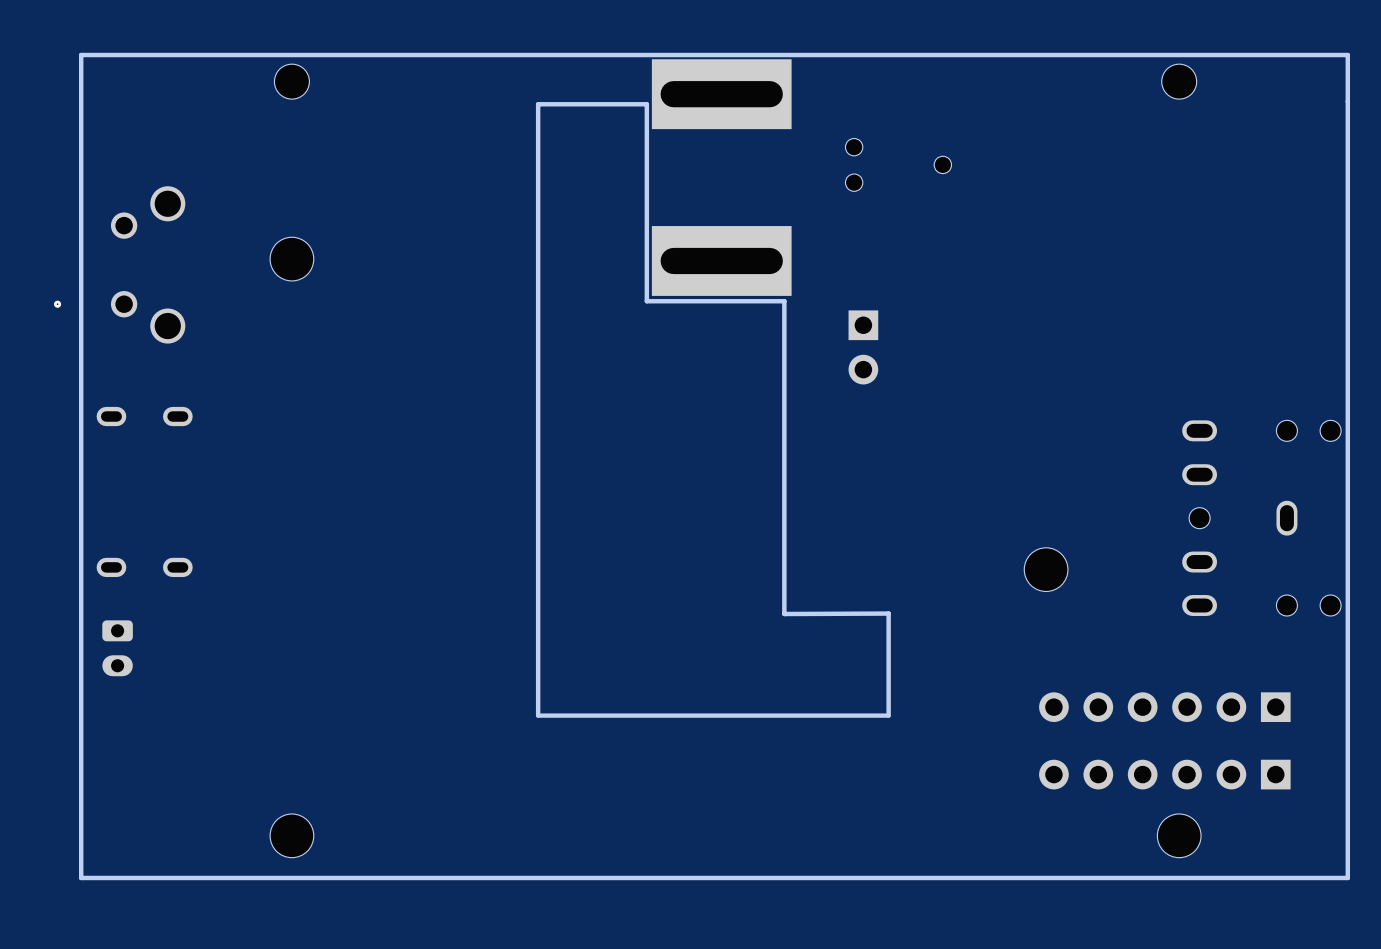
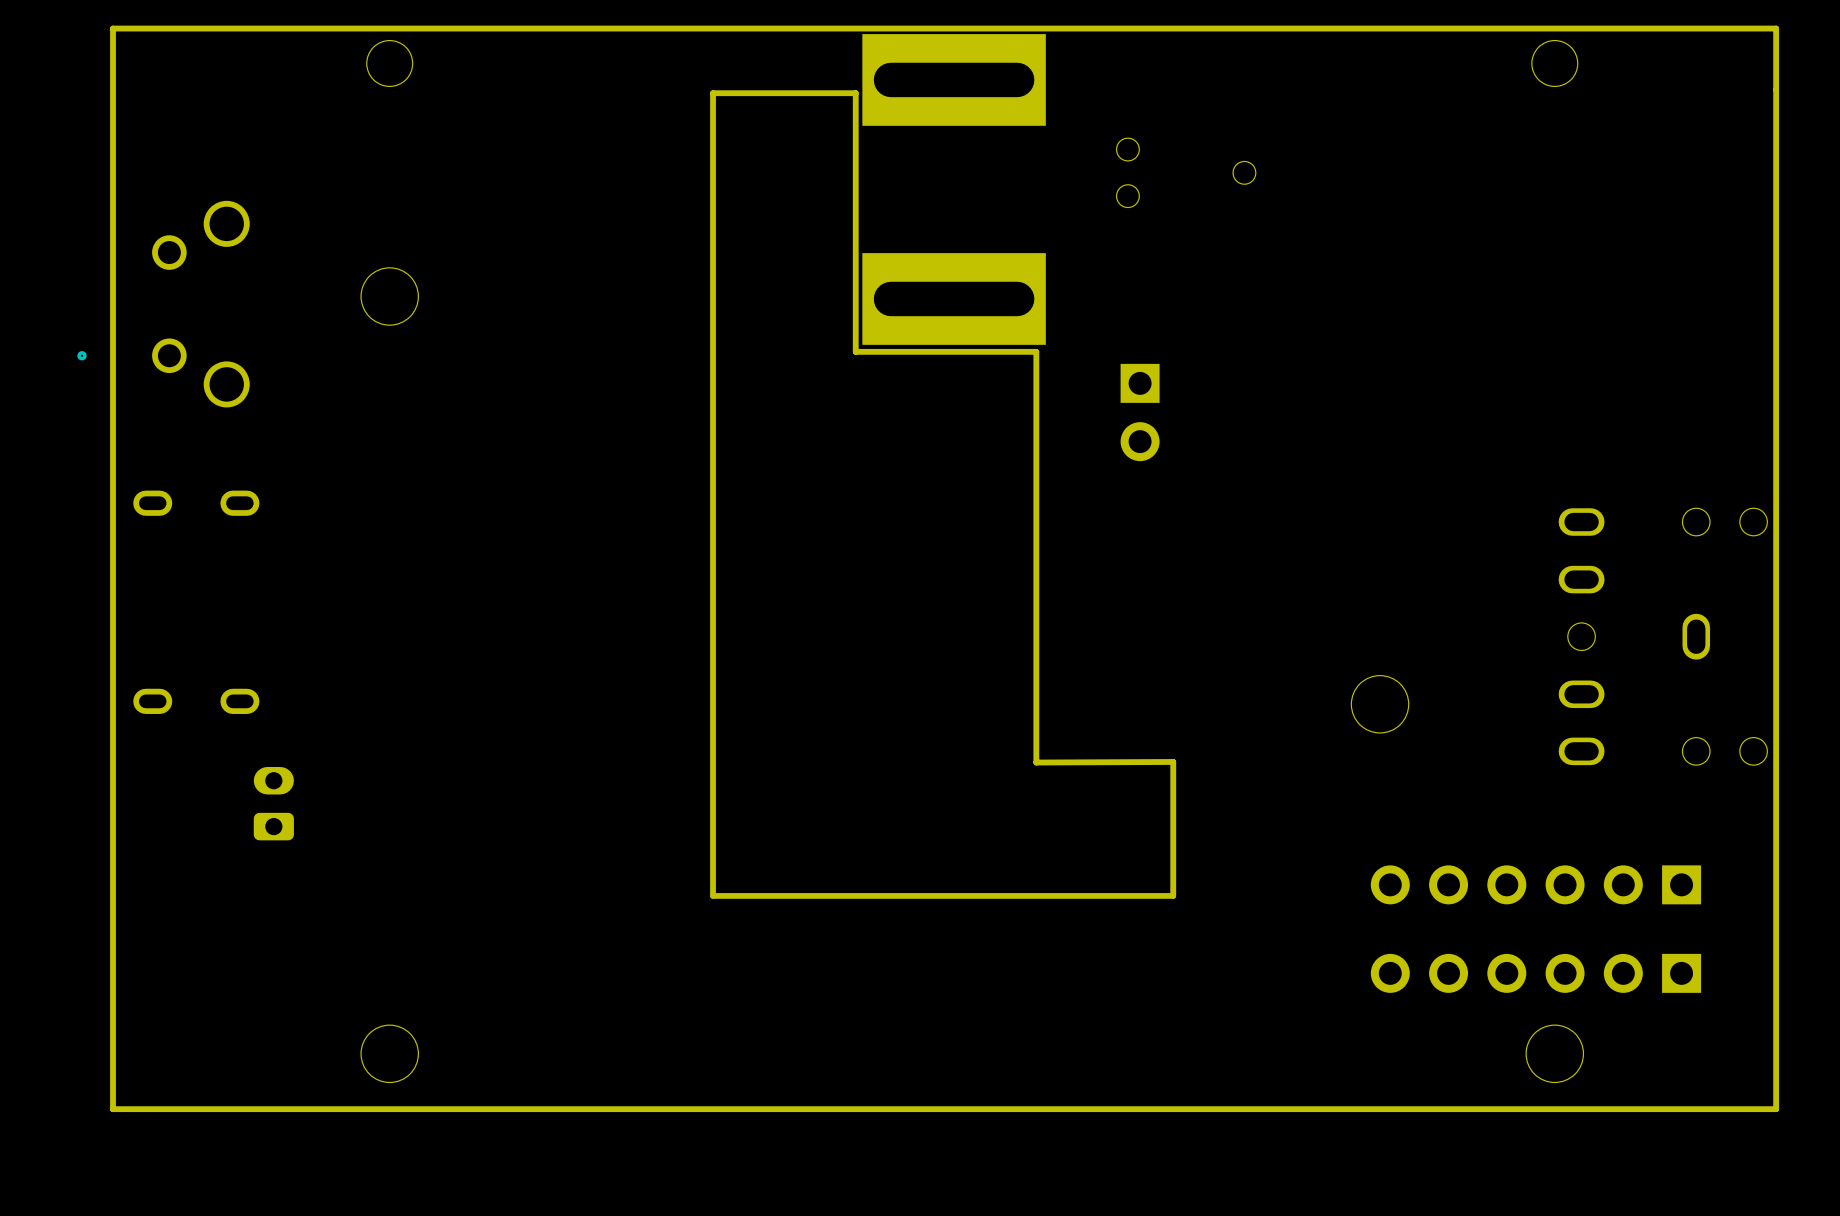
part rotation: 0° (117, 648) -> 180° (273, 803)
part position: (117, 648) -> (273, 803)

